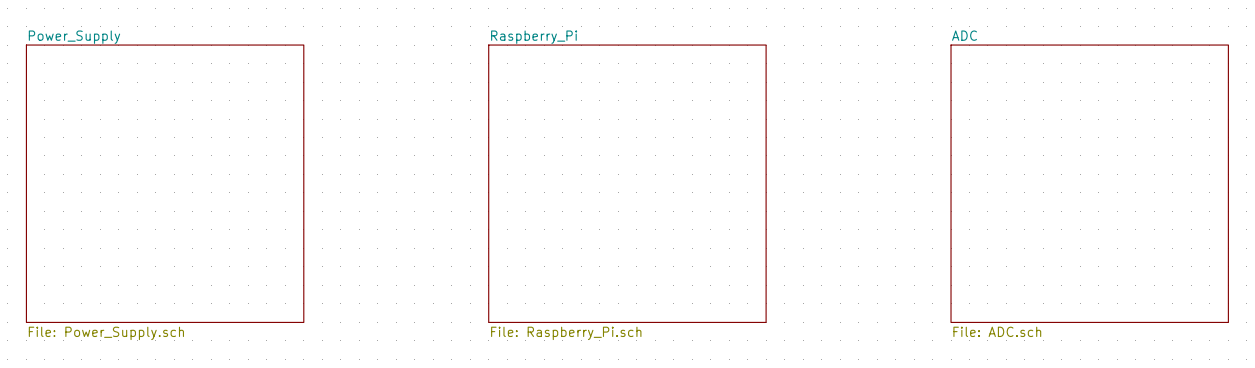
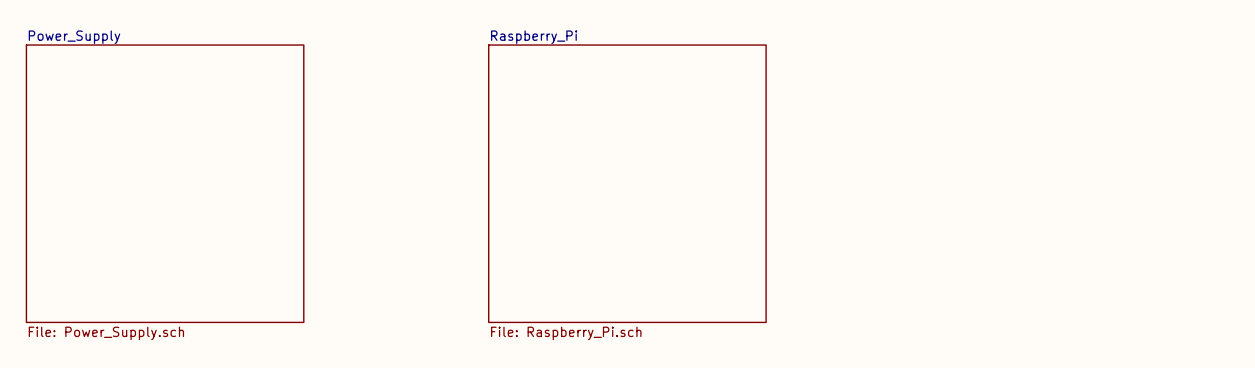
sheet ADC: File: ADC.sch (1089, 183) -> none

